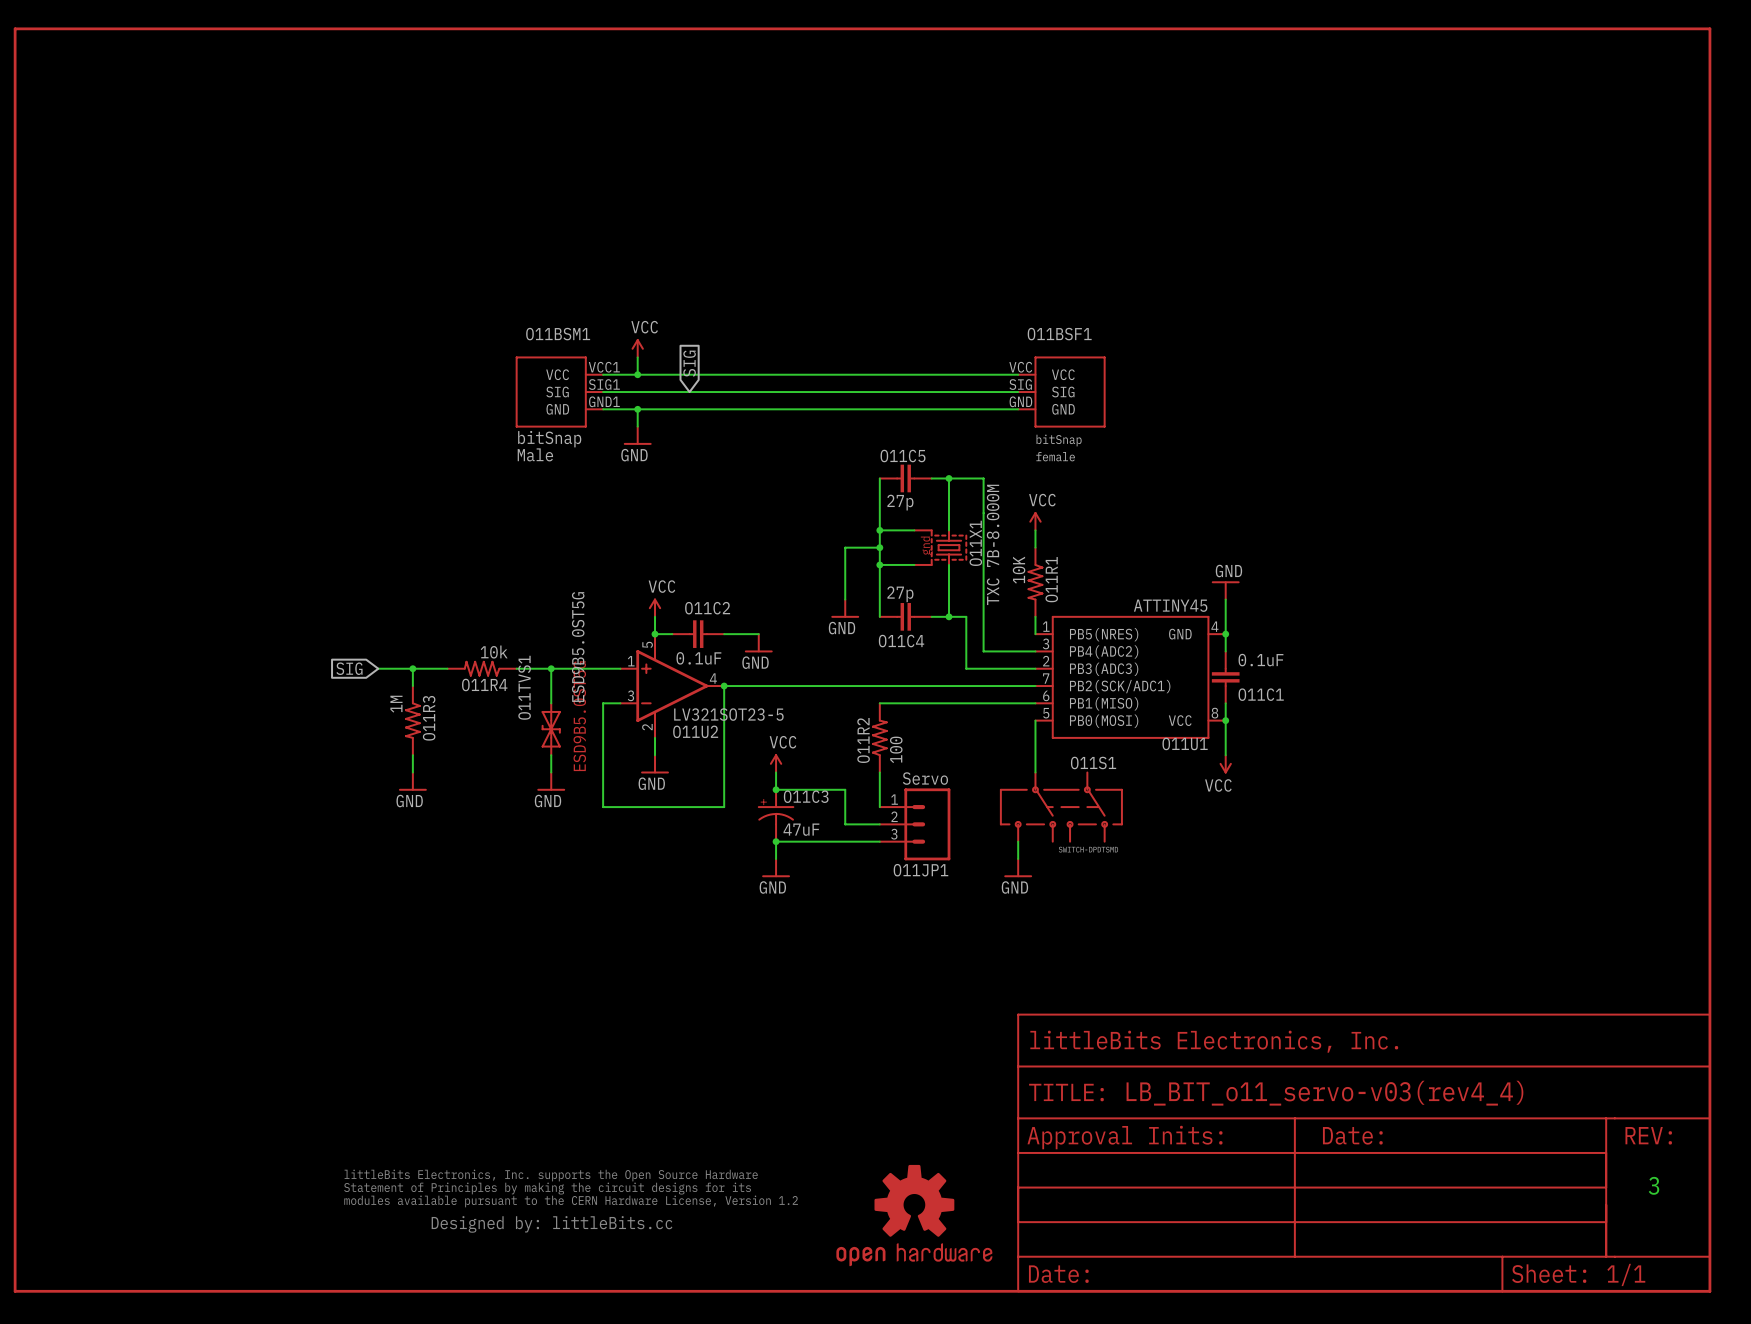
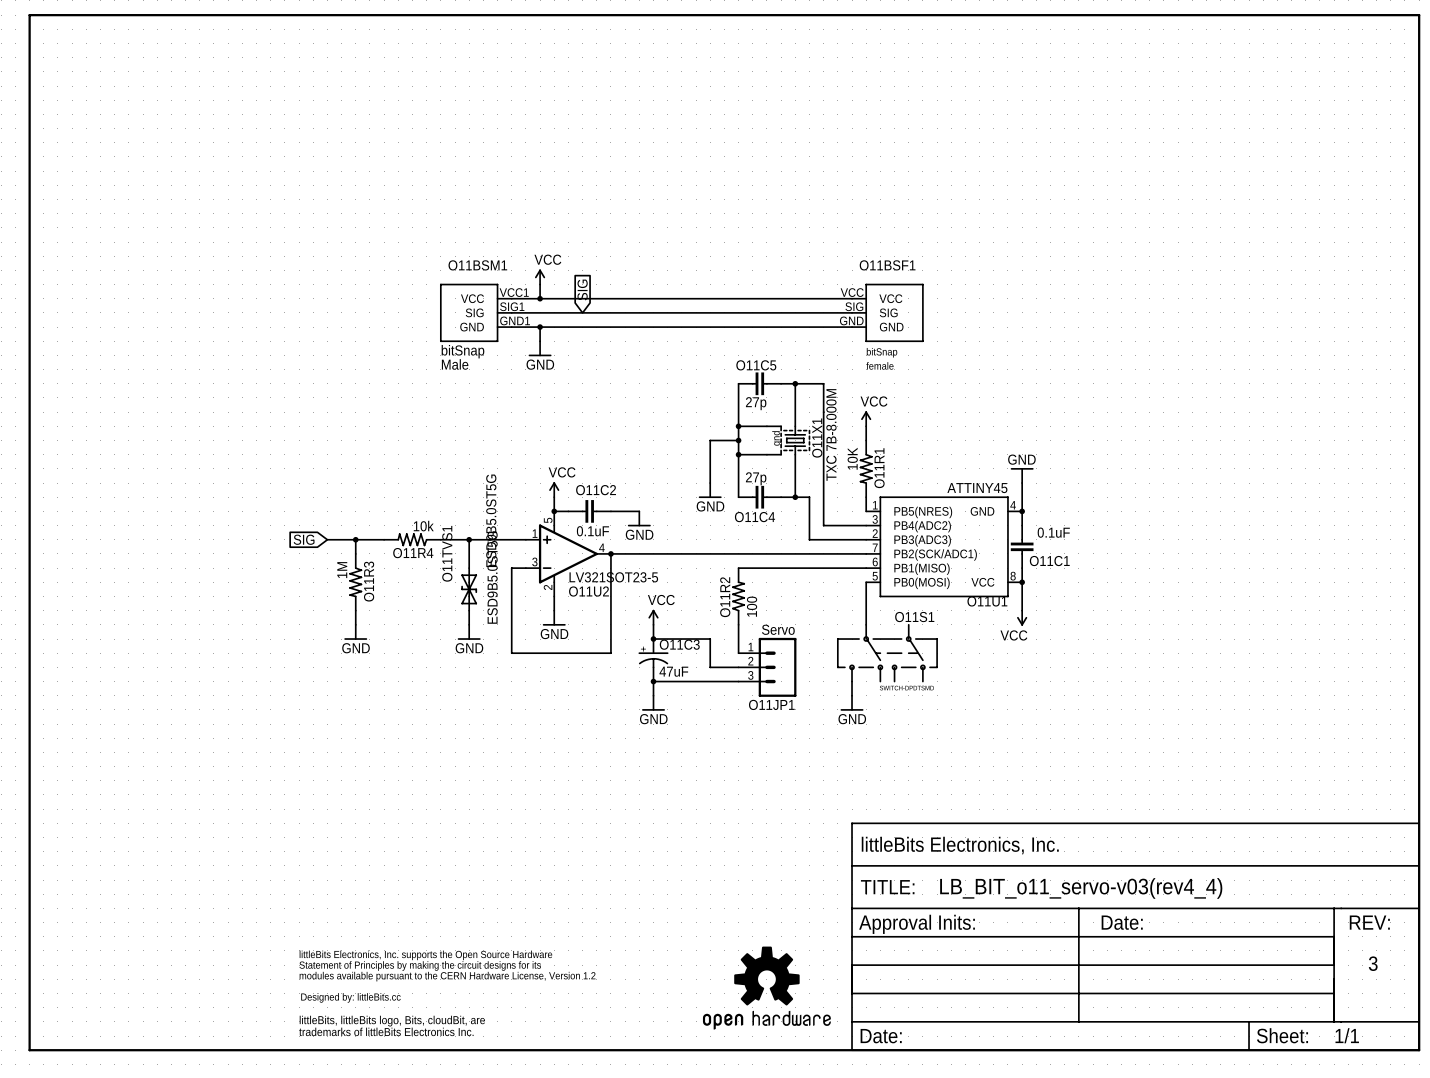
part: (571, 1201) -> none
part: none -> (447, 993)

